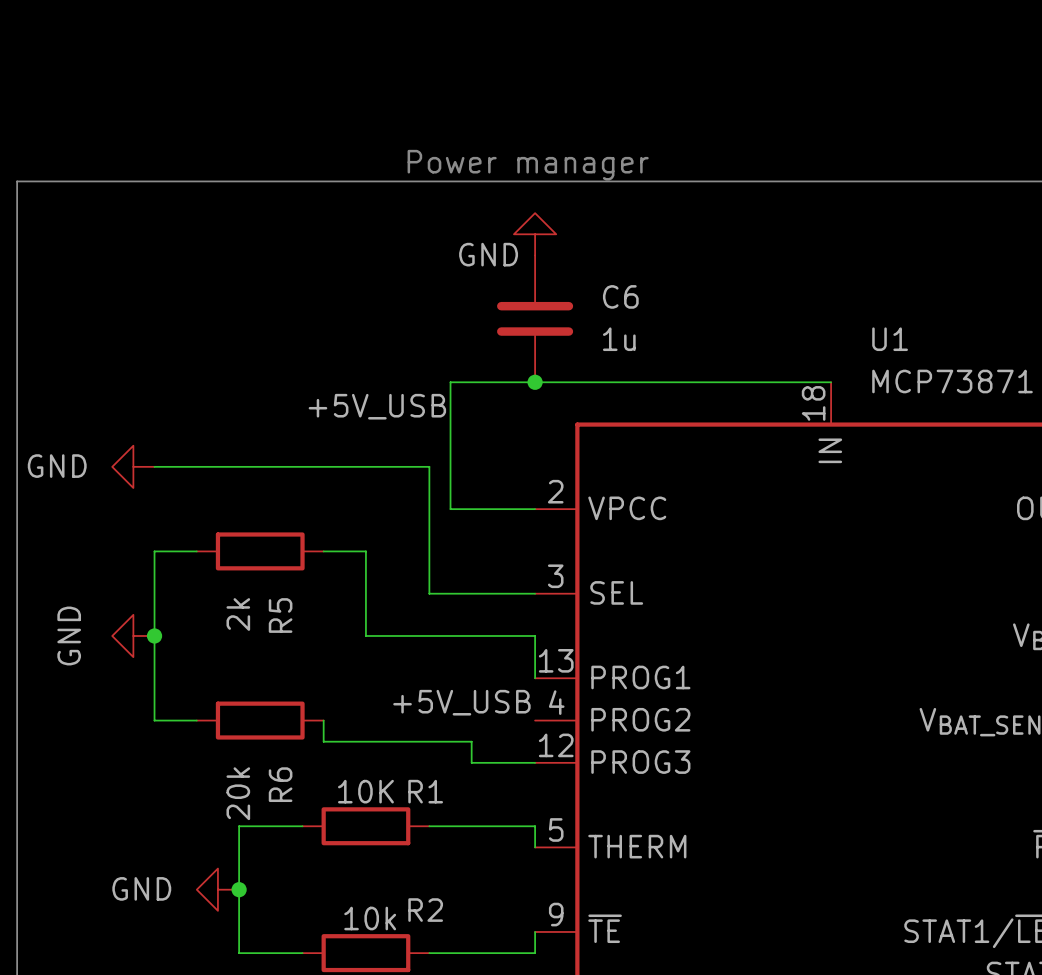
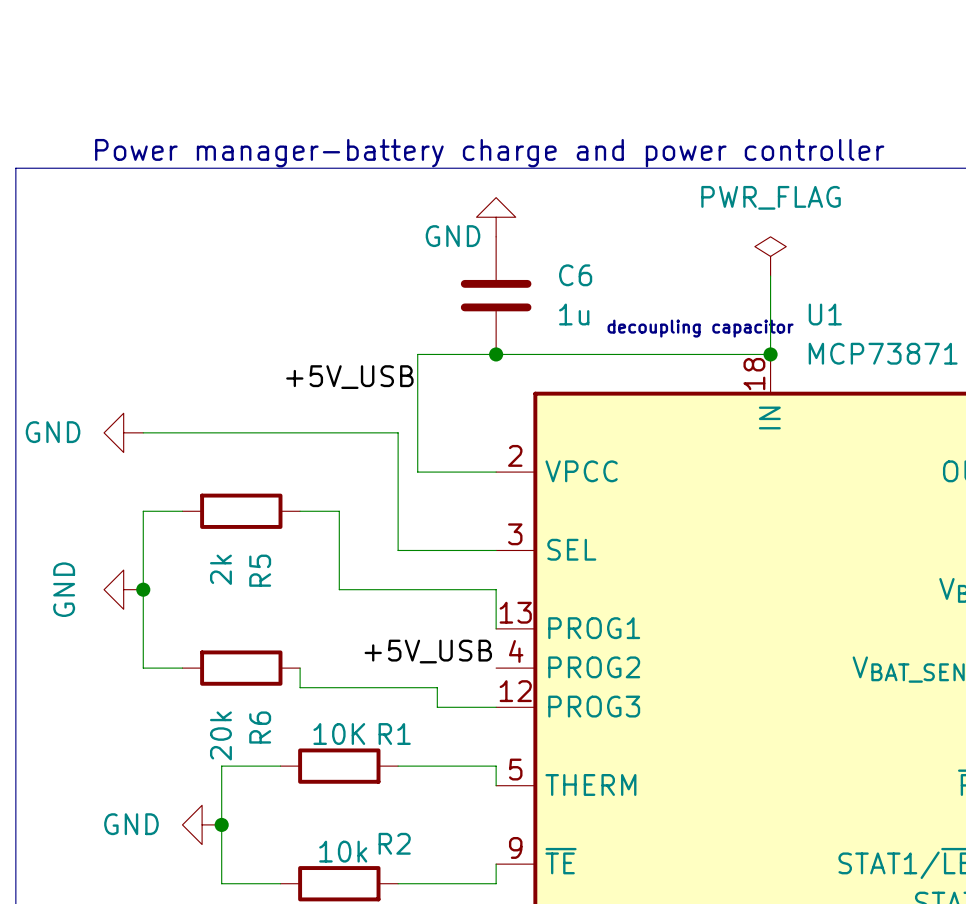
text: Power manager (528, 165) -> Power manager-battery charge and power controller (489, 153)
power symbol: none -> PWR_FLAG (770, 256)
wire: none -> (770, 276) (770, 354)
text: none -> decoupling capacitor (700, 328)
junction: none -> (770, 354)

